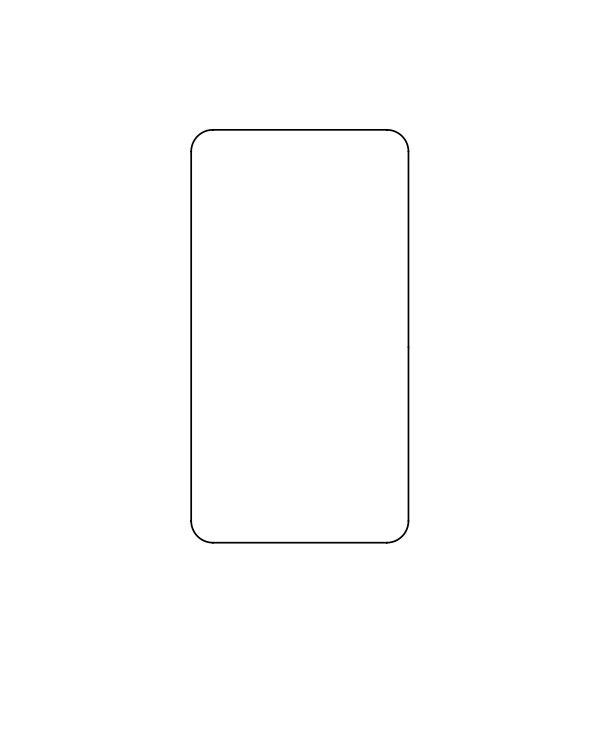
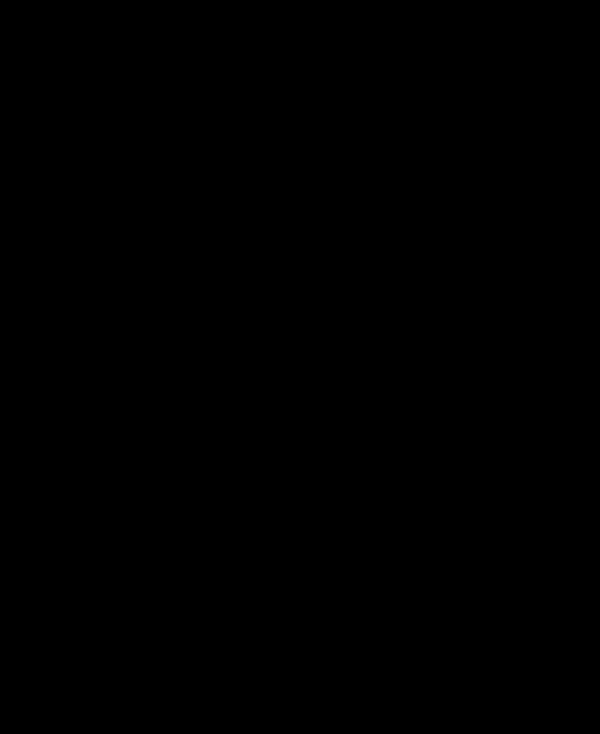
board edge: (386, 129) (210, 130) (199, 134) (192, 143) (191, 151) (191, 520) (195, 534) (204, 541) (212, 542) (386, 542) (399, 538) (406, 529) (408, 520) (408, 151) (406, 143) (402, 136) (395, 131) (386, 129) -> none

